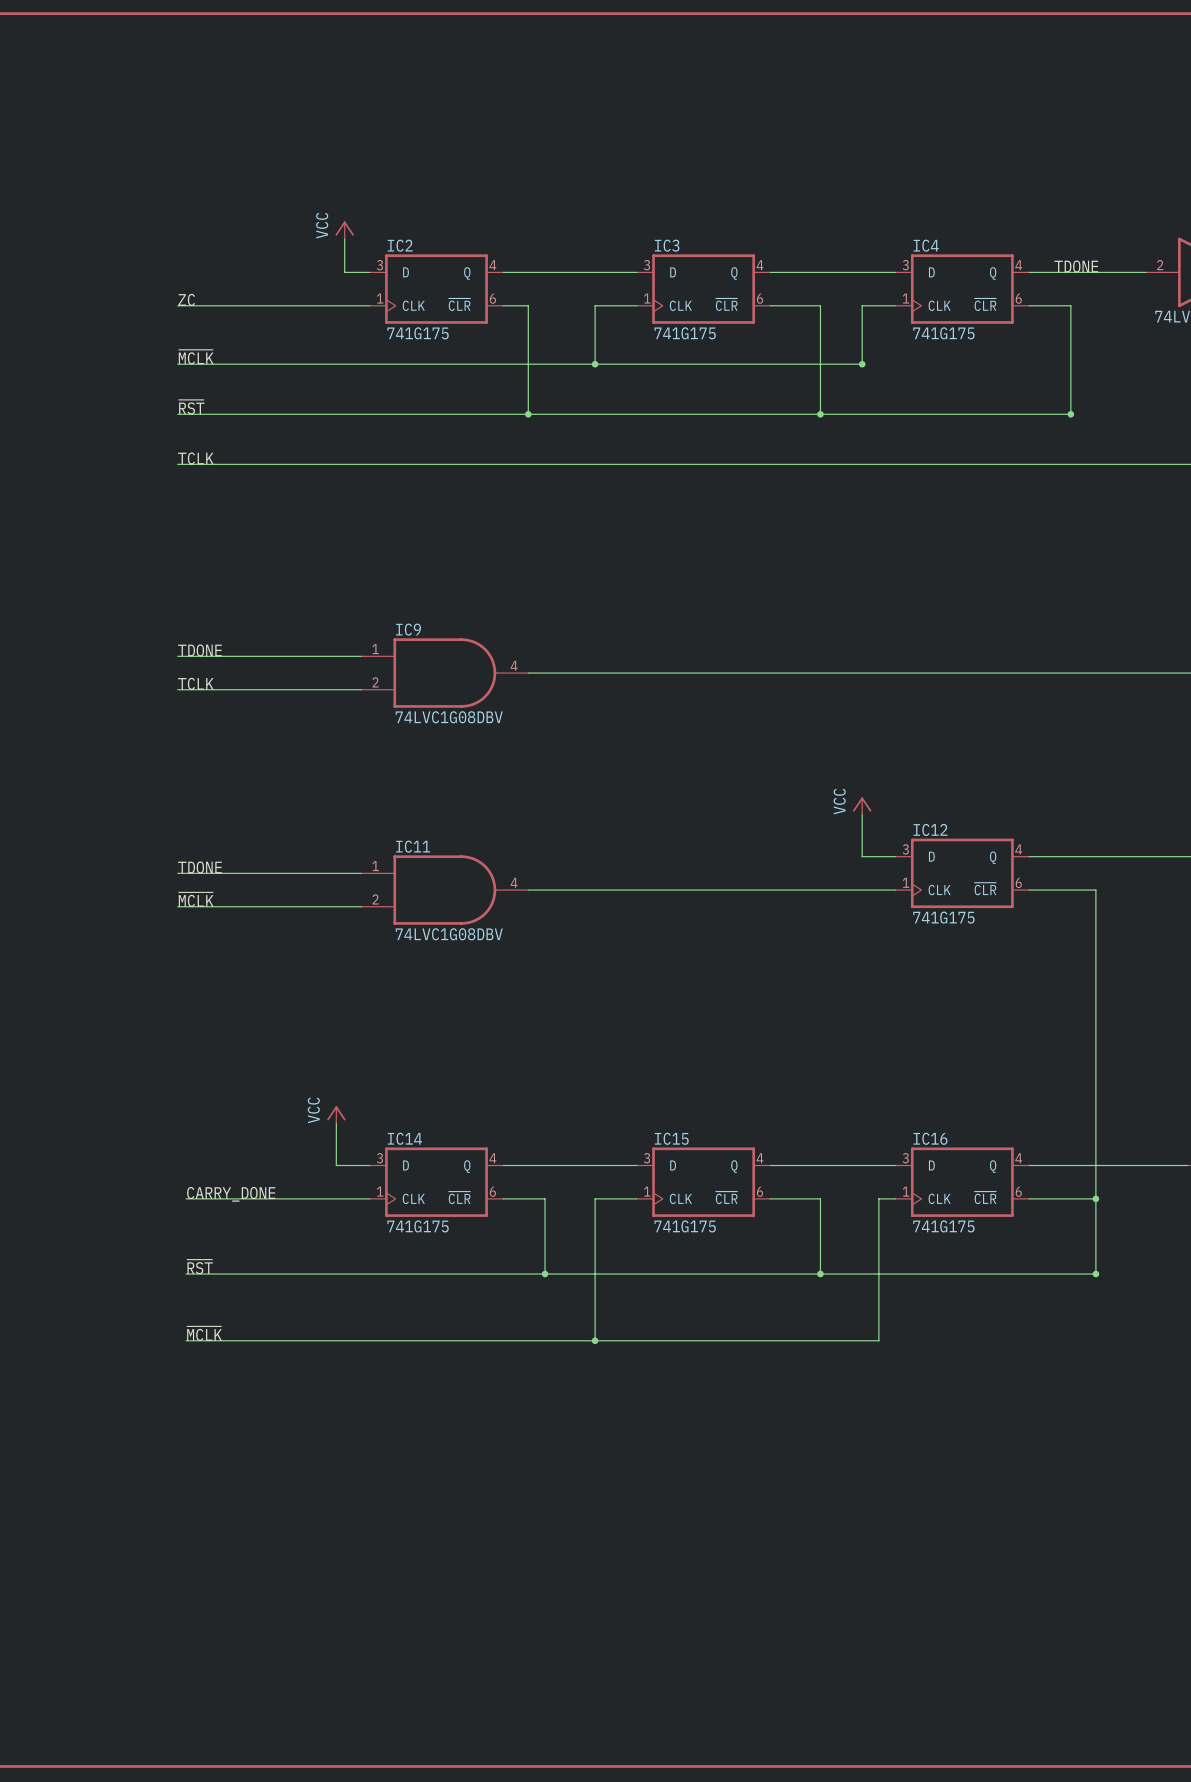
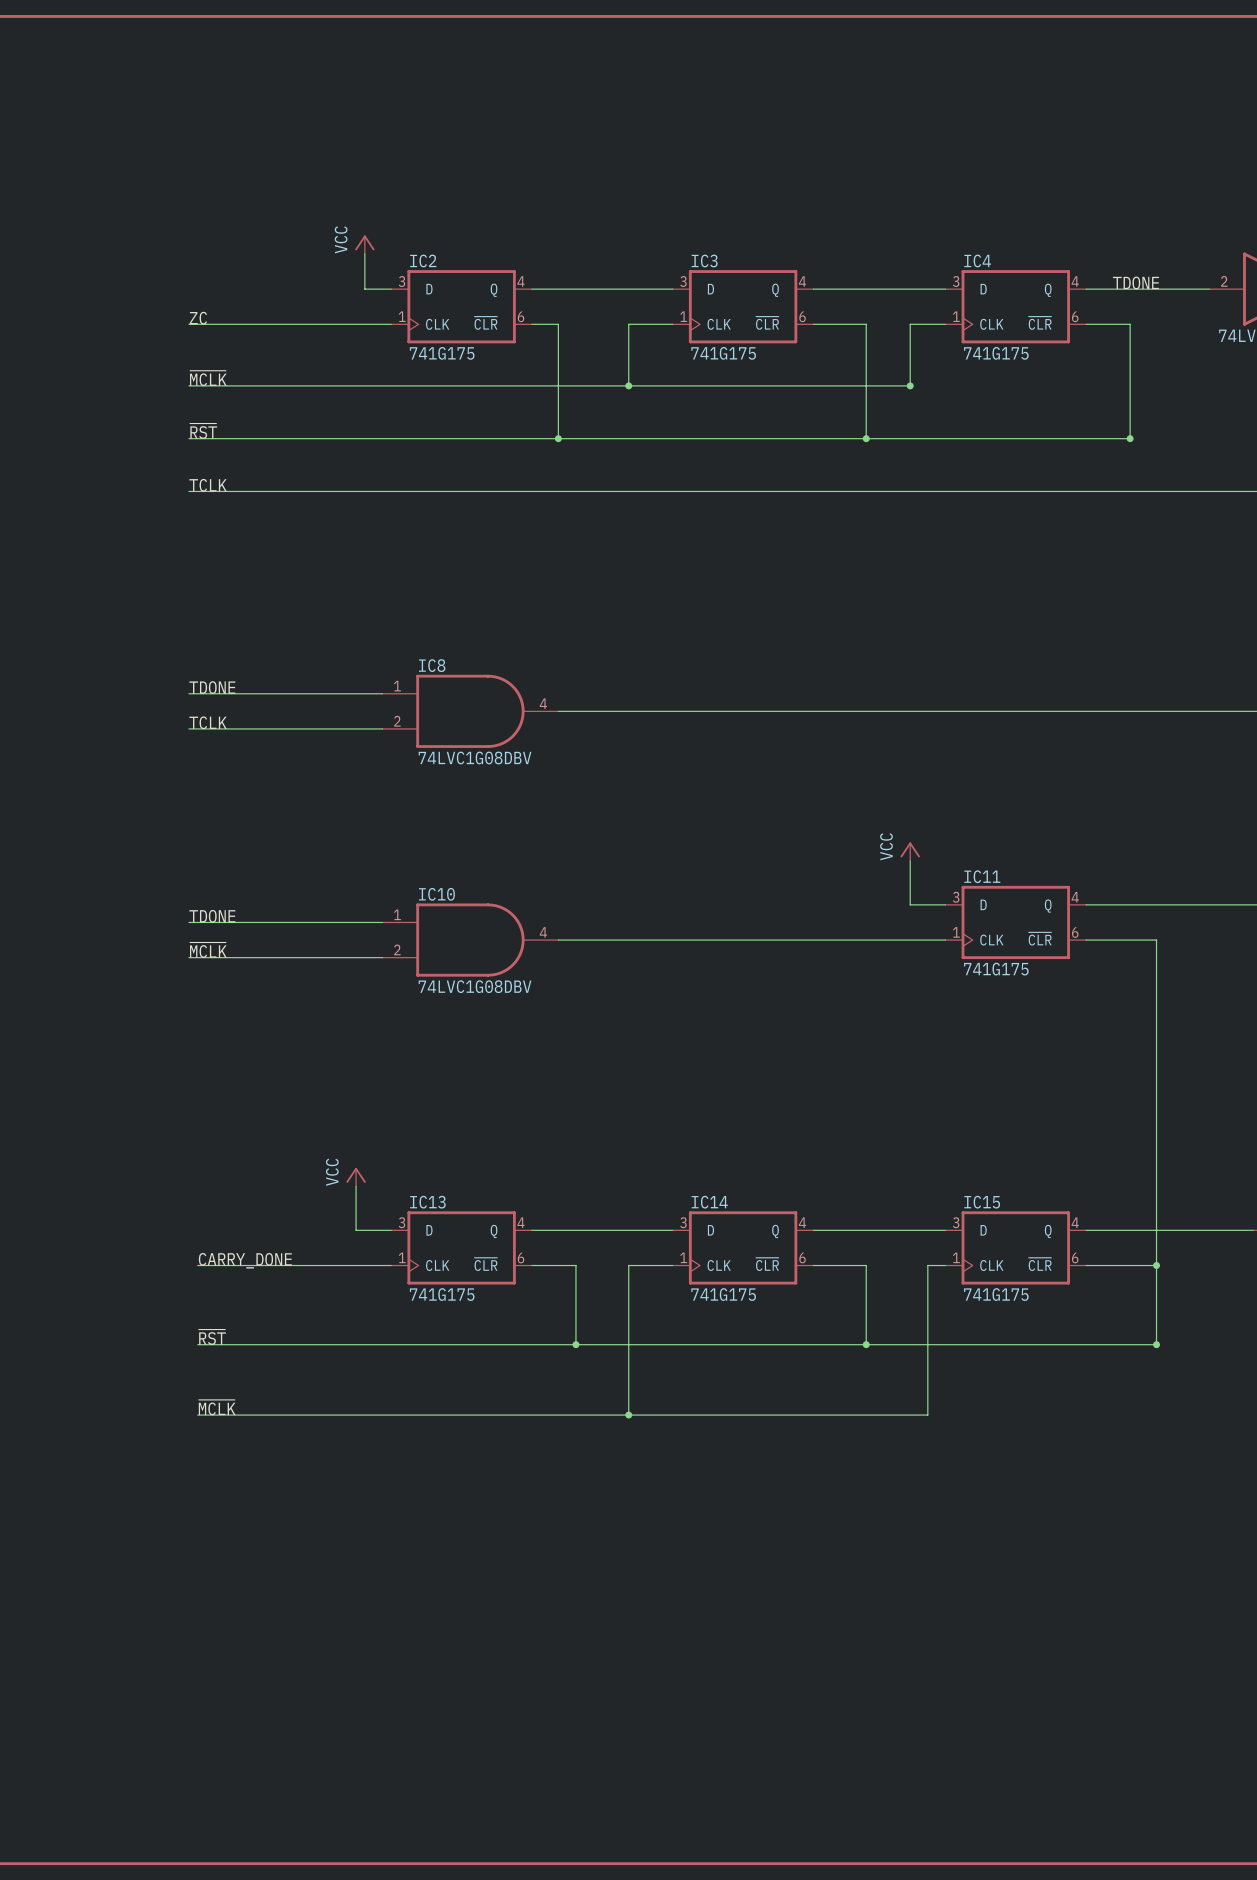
IC9 name: IC9 (408, 629) -> IC8 (432, 665)
IC12 name: IC12 (930, 829) -> IC11 (982, 876)
IC11 name: IC11 (413, 846) -> IC10 (436, 894)
IC14 name: IC14 (404, 1138) -> IC13 (427, 1202)
IC15 name: IC15 (671, 1138) -> IC14 (709, 1202)
IC16 name: IC16 (930, 1138) -> IC15 (982, 1202)

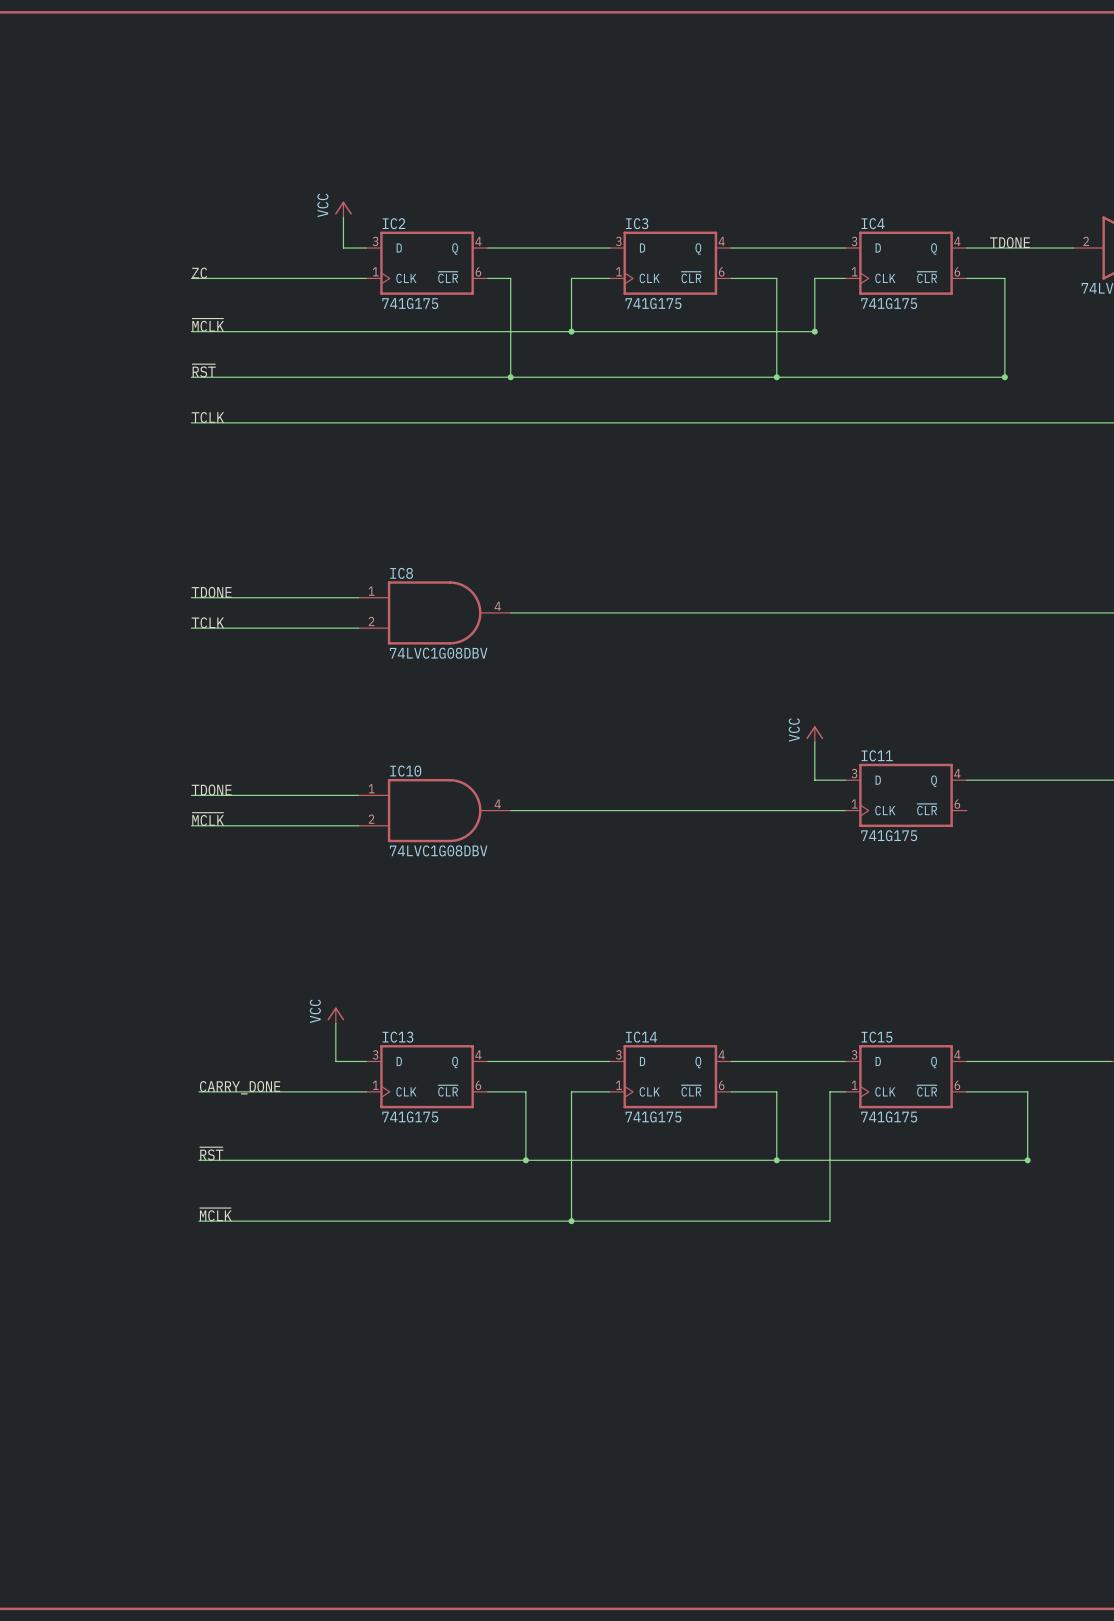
wire: (1086, 940) (1156, 940) (1156, 1265) -> none
junction: (1156, 1265) -> none

